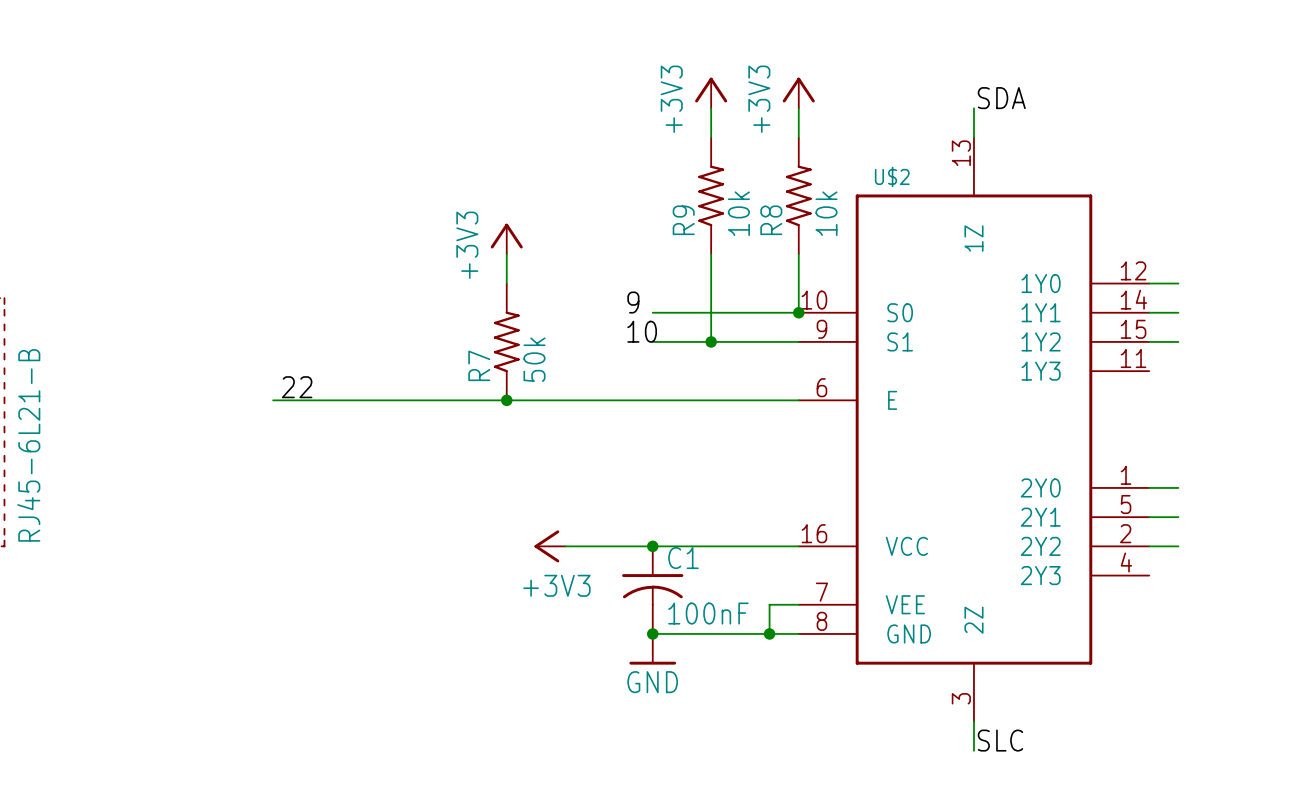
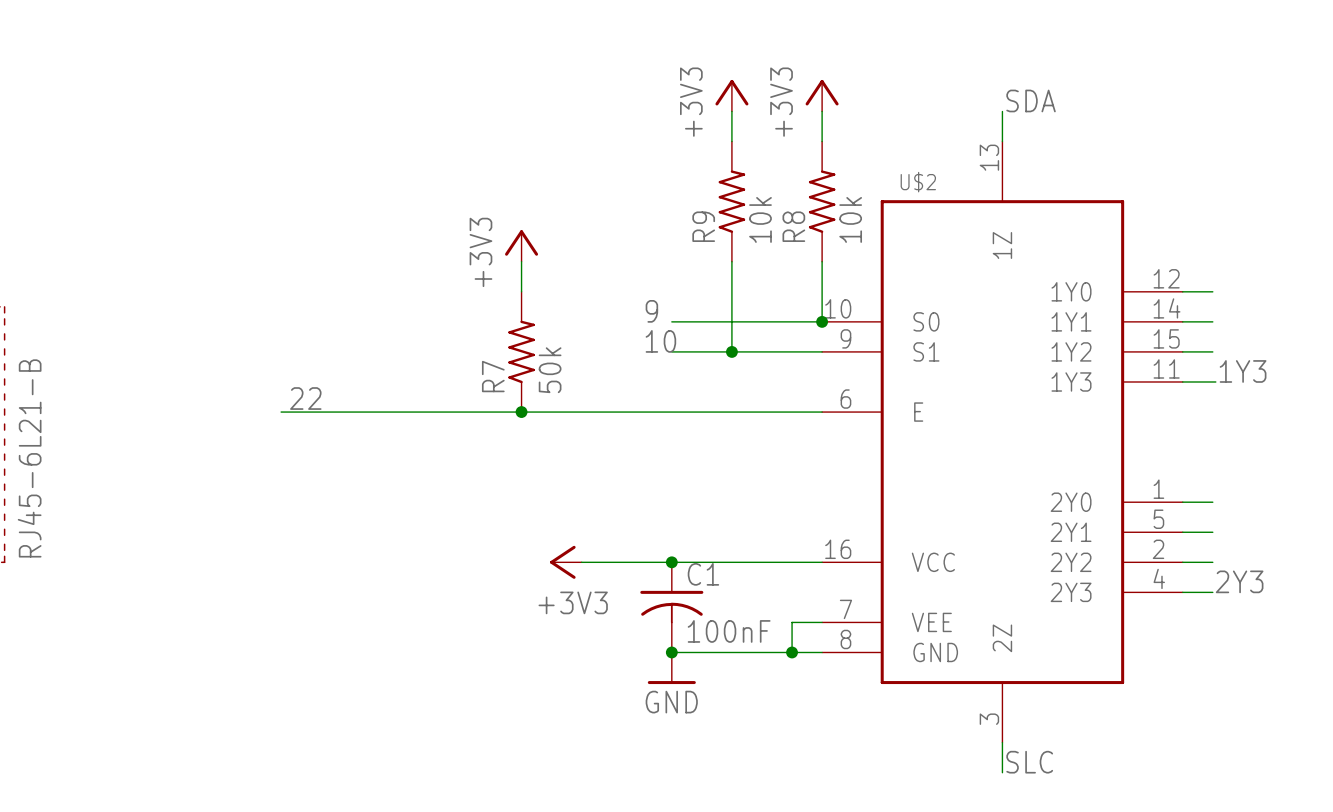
label: none -> 1Y3 (1243, 371)
wire: none -> (1182, 381) (1215, 381)
label: none -> 2Y3 (1239, 581)
wire: none -> (1182, 592) (1212, 592)

